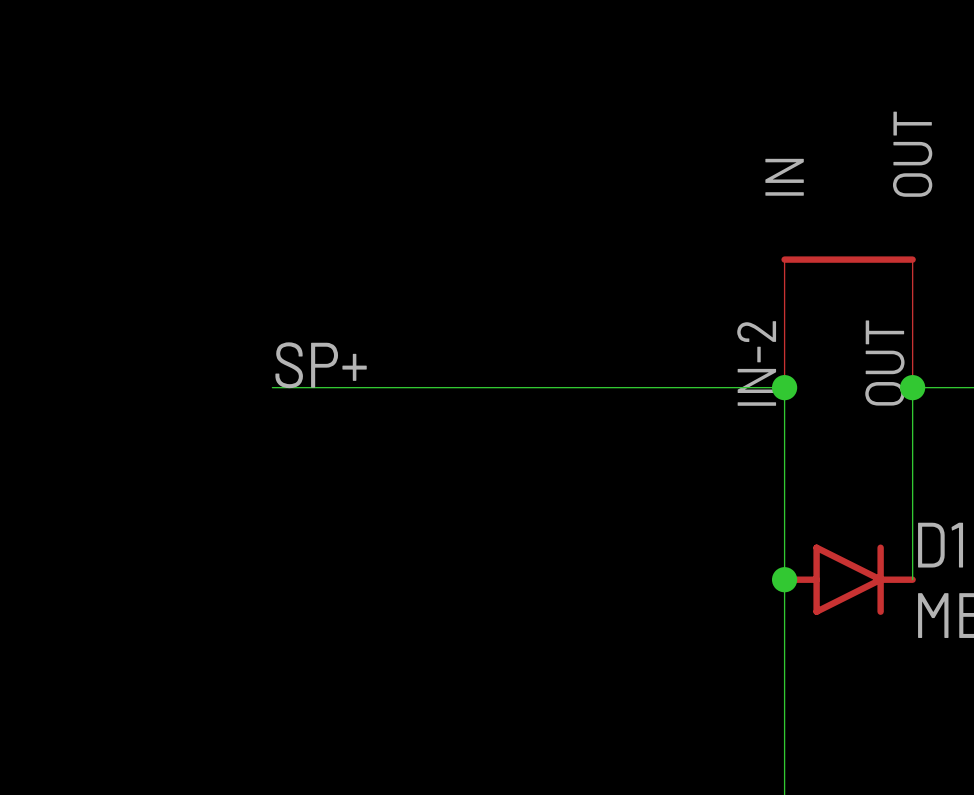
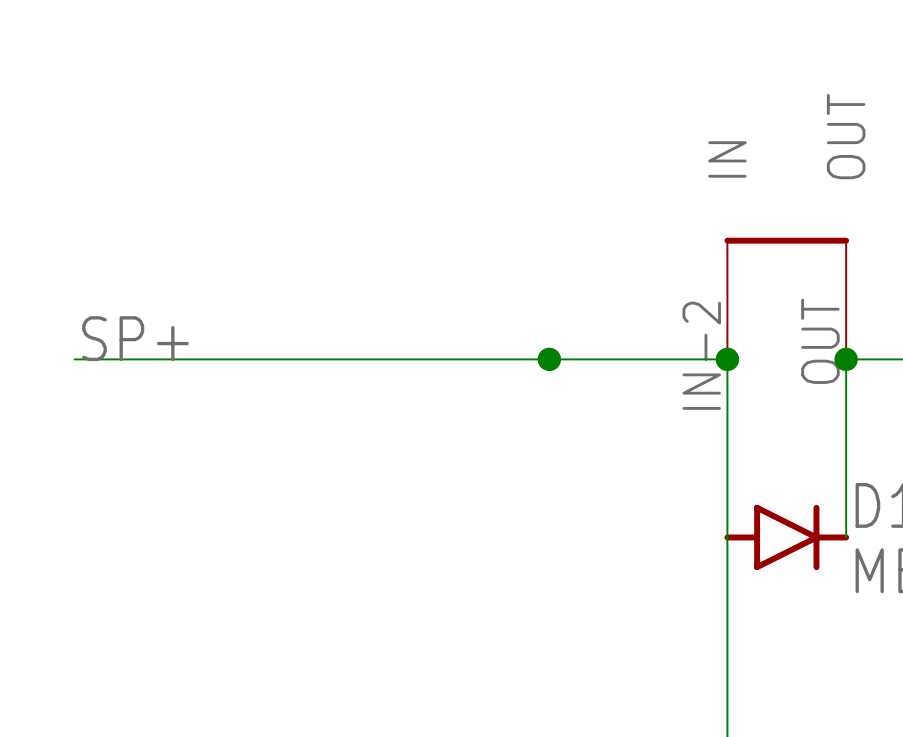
label position: SP+ (321, 365) -> SP+ (135, 338)
wire: none -> (74, 359) (252, 359)
junction: none -> (549, 359)
junction: (784, 579) -> none

